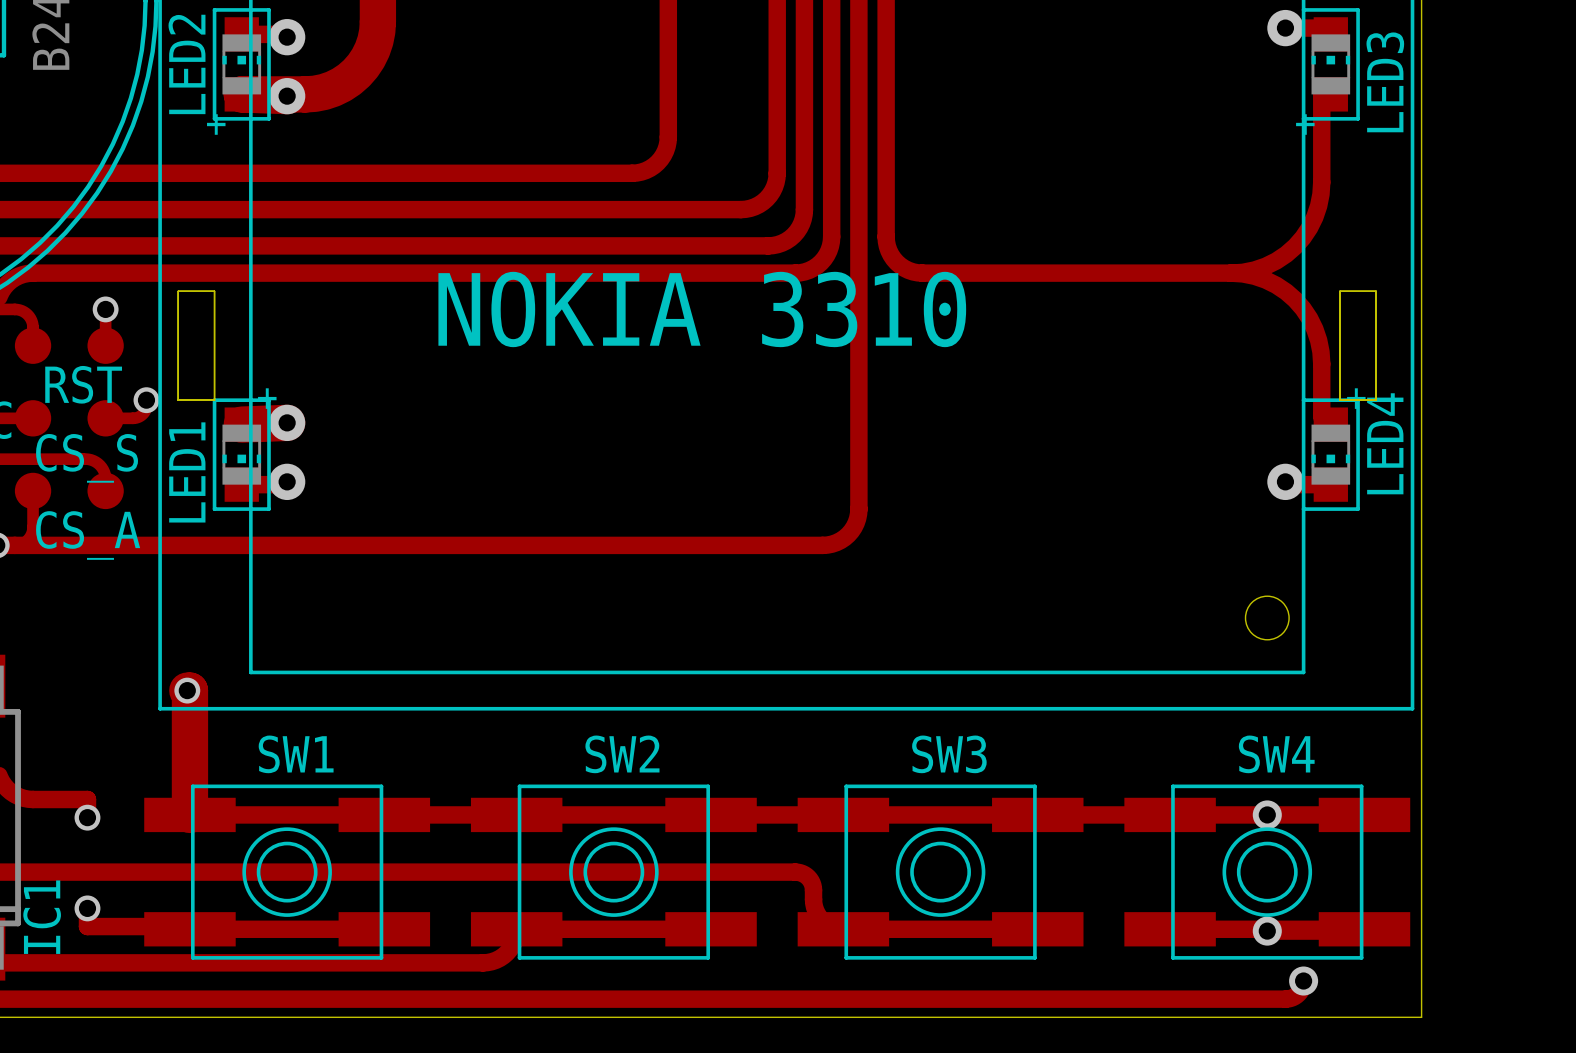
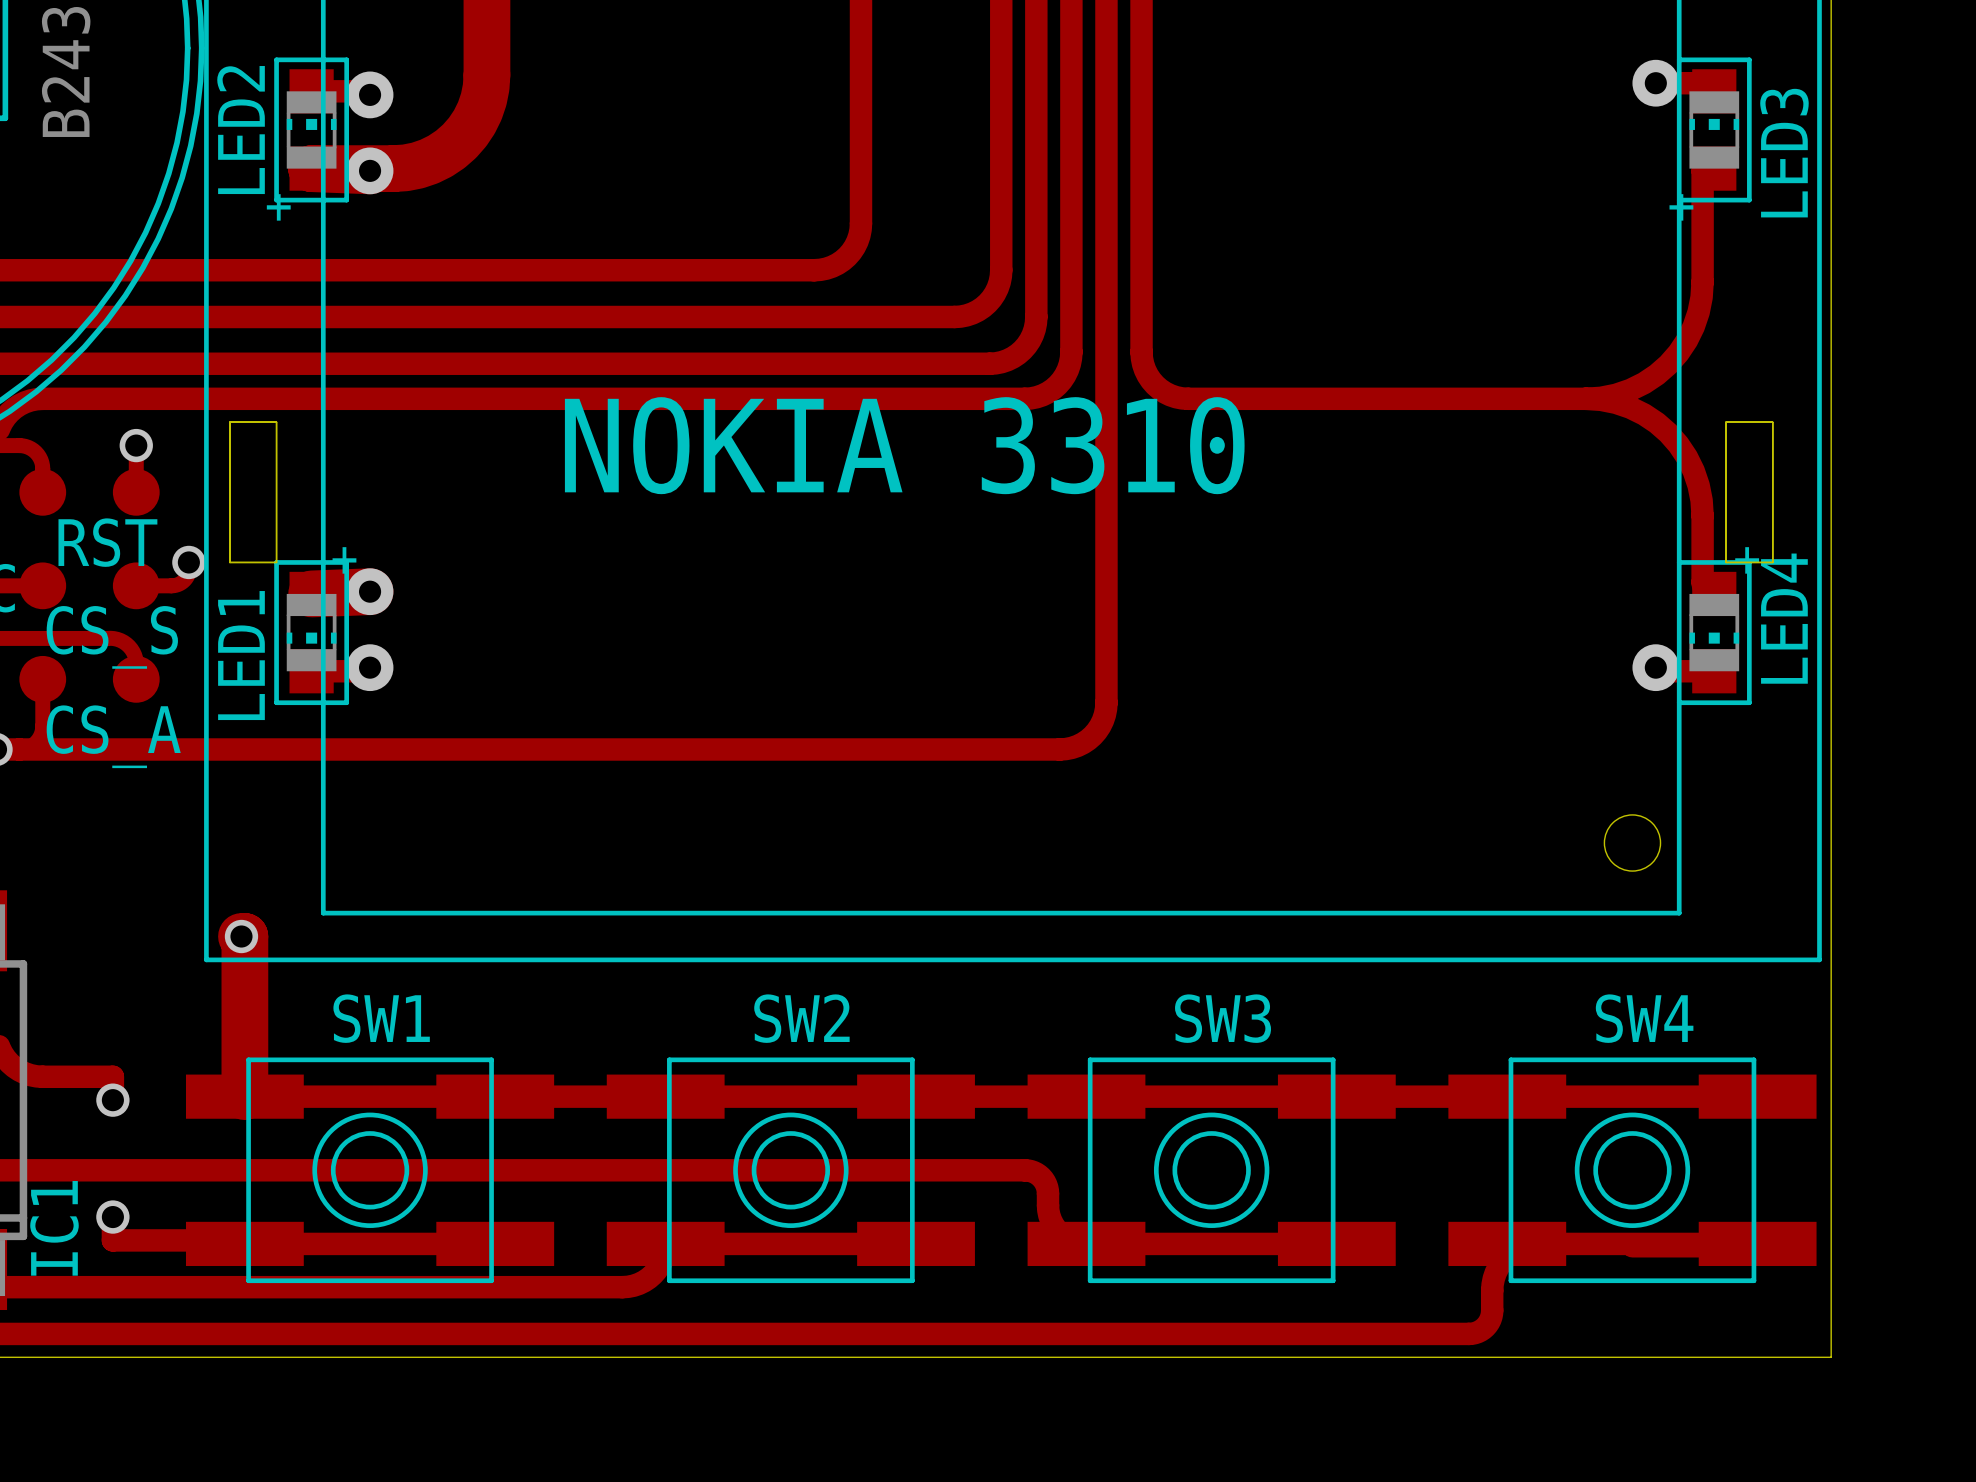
via: (1267, 814) -> none
via: (1267, 931) -> none
track: (1303, 981) (1299, 992) (1287, 999) (1140, 999) -> (1538, 1243) (1521, 1247) (1510, 1253) (1501, 1262) (1493, 1278) (1490, 1319) (1483, 1329) (1468, 1333)
via: (1303, 981) -> none

